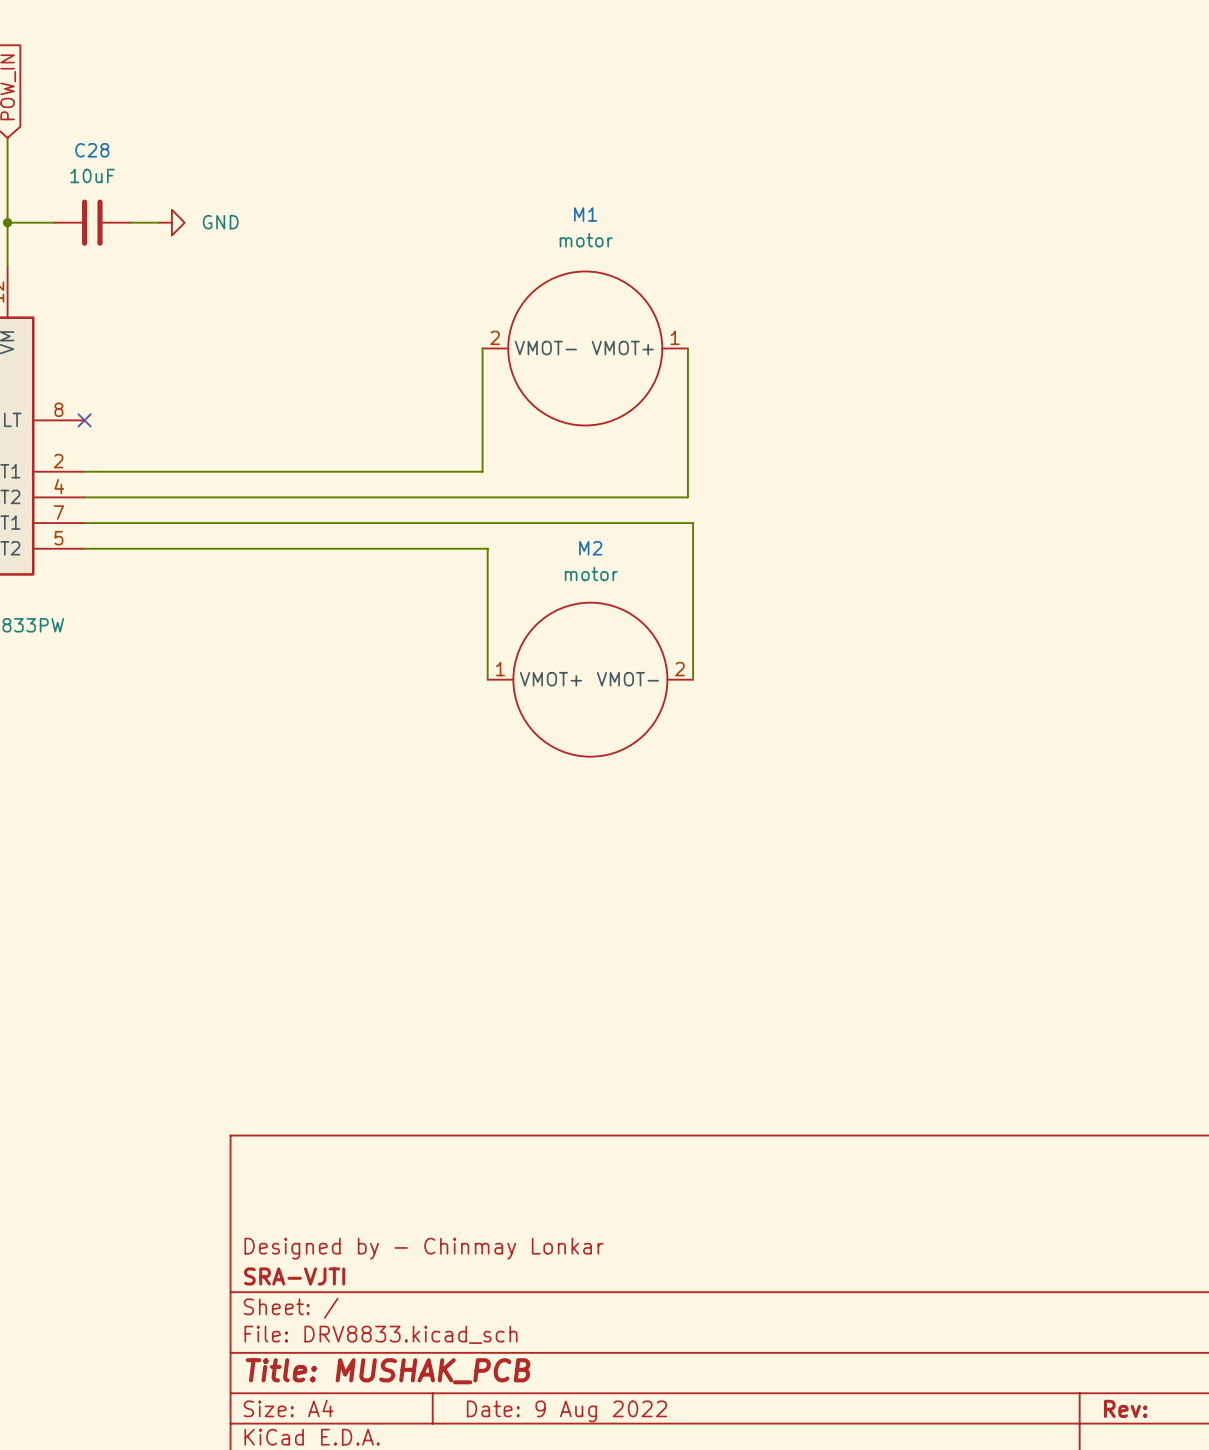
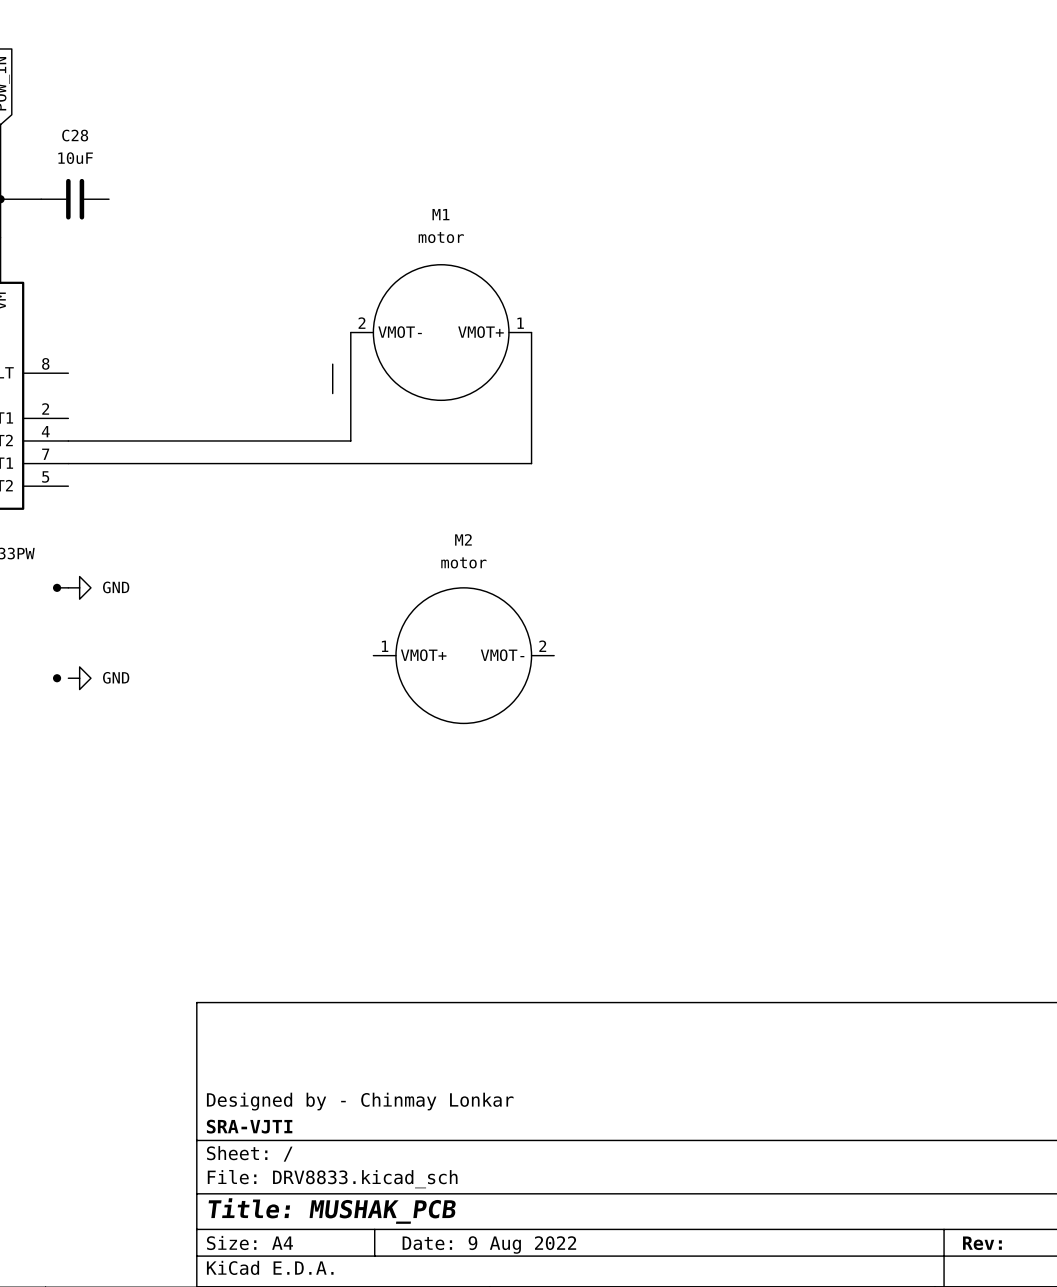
wire: (130, 222) (159, 222) -> none
power symbol: GND (171, 222) -> none
wire: (482, 348) (482, 471) (84, 471) -> none
M1 position: (585, 348) -> (441, 332)
wire: (687, 348) (687, 497) (405, 497) -> (350, 332) (350, 440)
wire: none -> (332, 364) (332, 393)
no-connect mark: (84, 420) -> none
wire: (610, 523) (693, 523) (693, 679) -> (531, 463) (531, 332)
wire: (84, 548) (487, 548) (487, 679) -> none
wire: none -> (57, 587) (68, 587)
junction: none -> (57, 587)
power symbol: none -> GND (79, 587)
M2 position: (590, 679) -> (463, 655)
junction: none -> (57, 678)
power symbol: none -> GND (79, 678)

